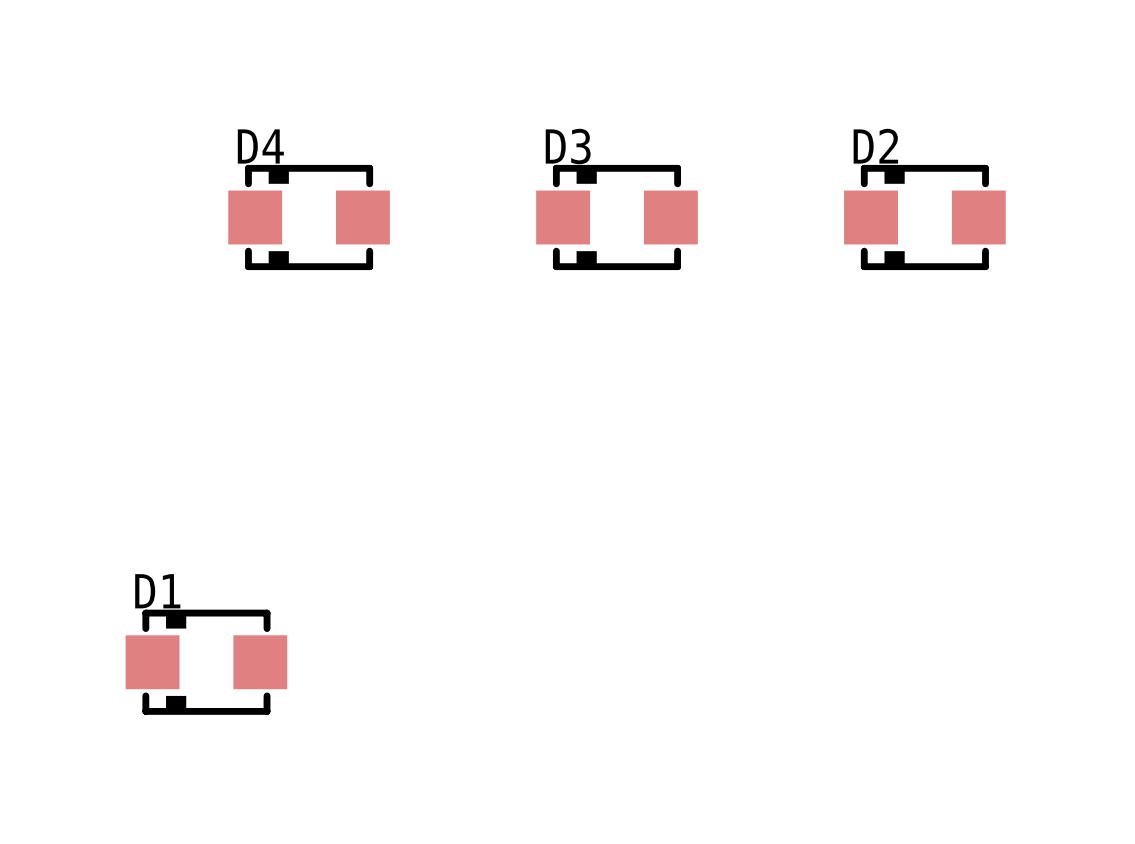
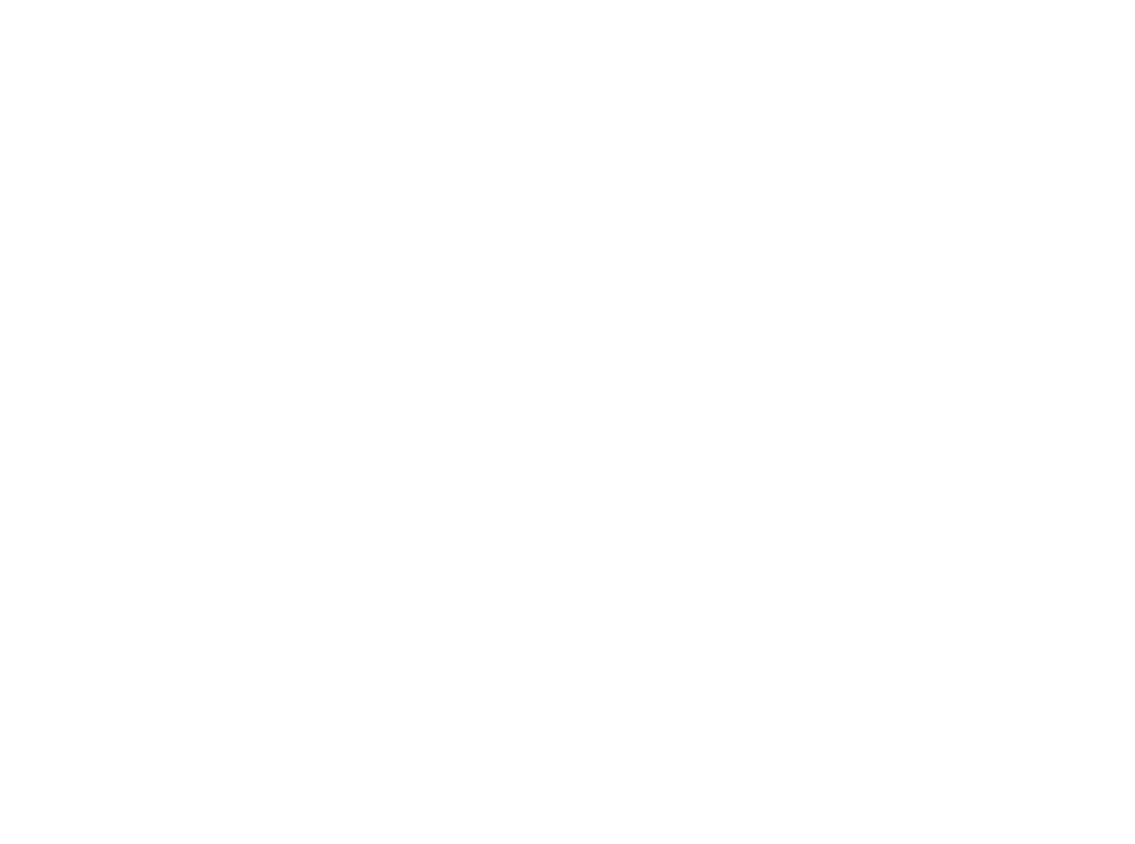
D4: (309, 217) -> none
D3: (616, 217) -> none
D2: (924, 217) -> none
D1: (206, 662) -> none

